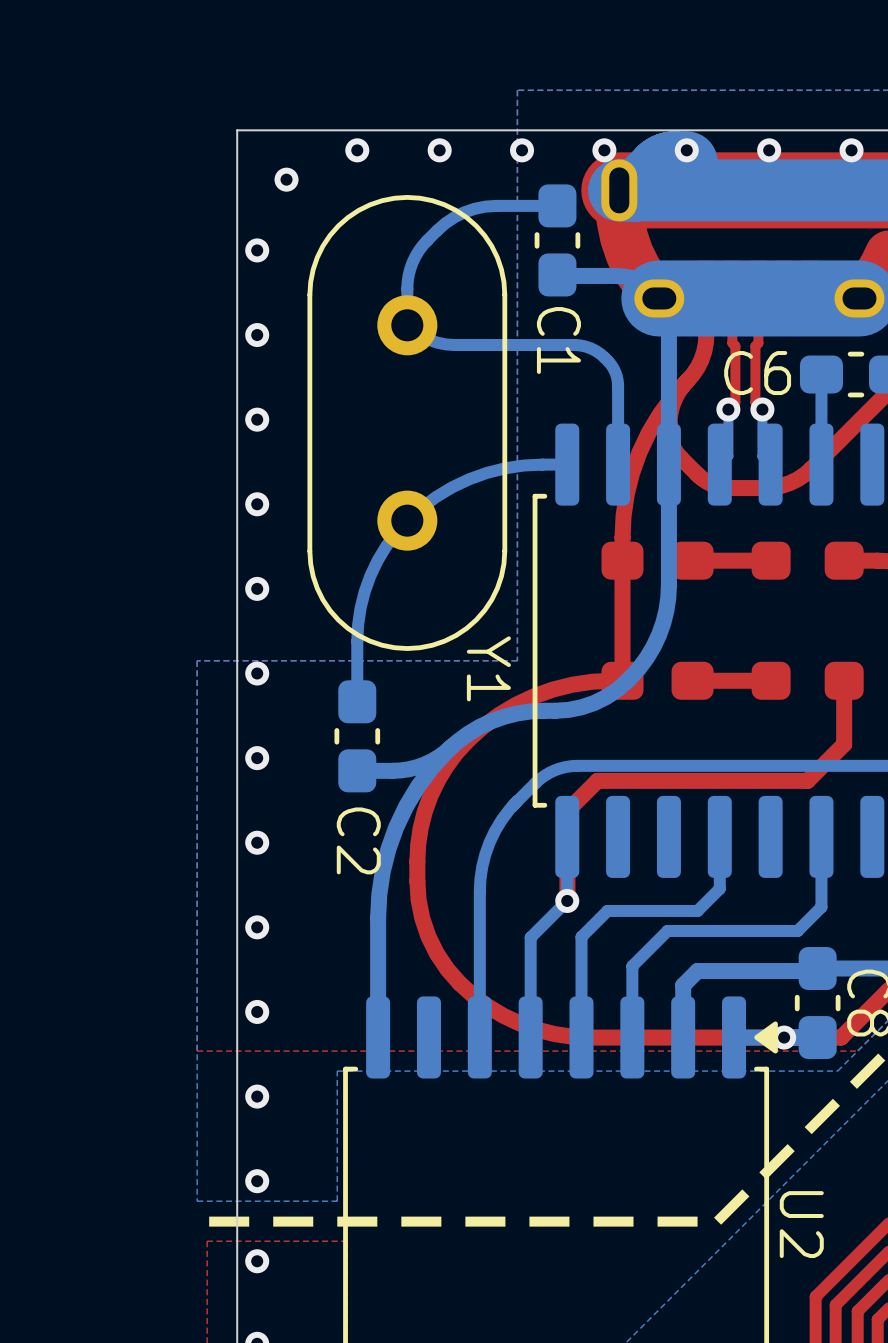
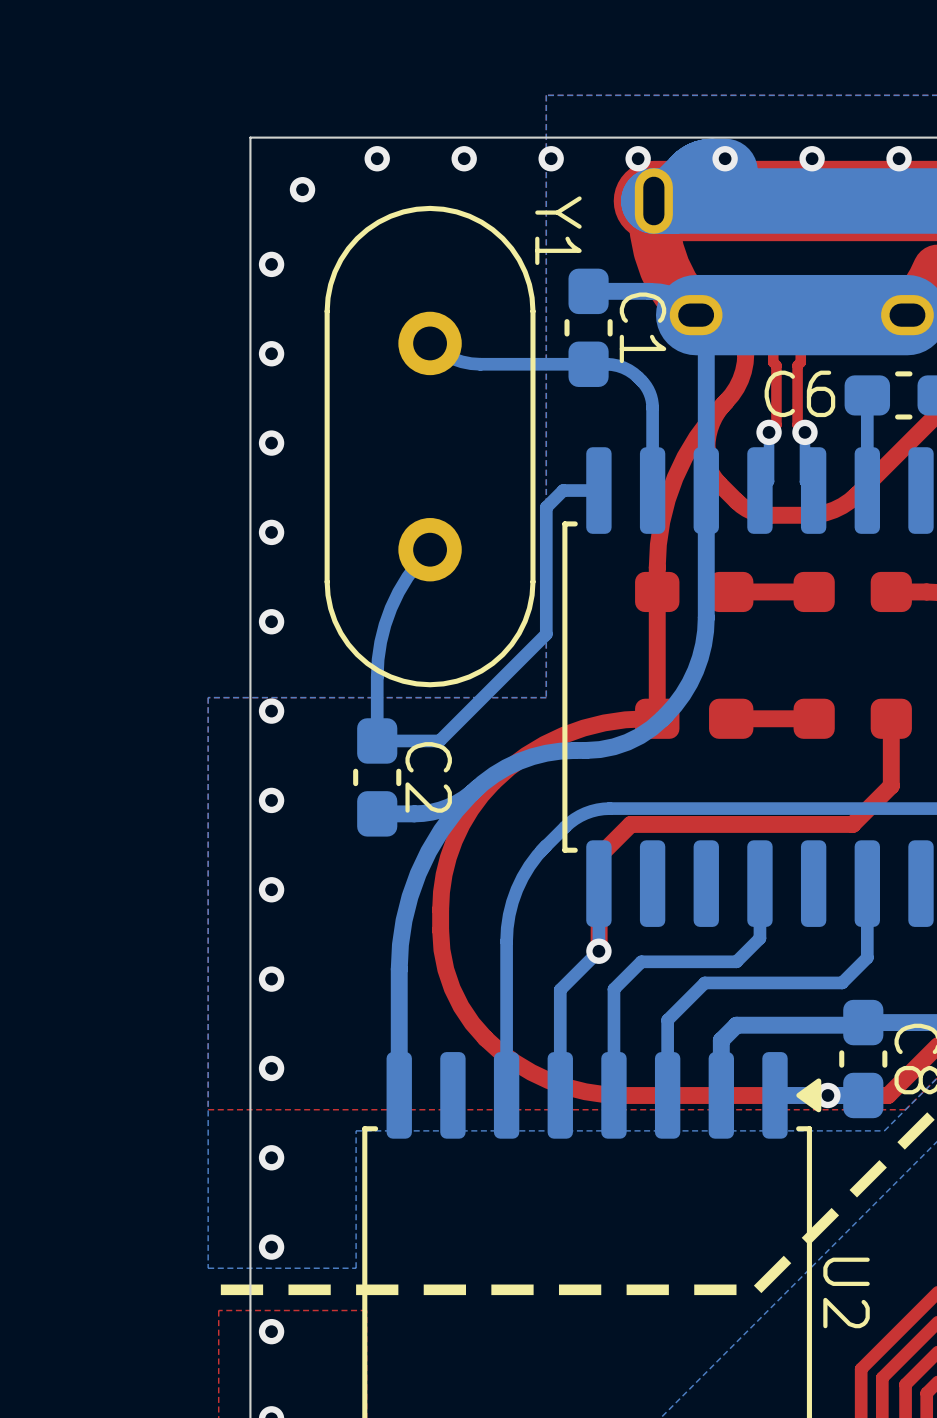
bottom track: (557, 205) (485, 206) (464, 212) (445, 223) (422, 245) (412, 262) (407, 282) (407, 325) -> none
C1 position: (557, 240) -> (588, 327)
C1 name position: C1 (558, 340) -> C1 (642, 327)
bottom track: (542, 464) (505, 468) (469, 479) (436, 496) (407, 520) -> (572, 490) (563, 490) (546, 507) (546, 634) (439, 740) (377, 740)
Y1 name position: Y1 (488, 668) -> Y1 (558, 230)
C2 name position: C2 (358, 840) -> C2 (428, 777)

